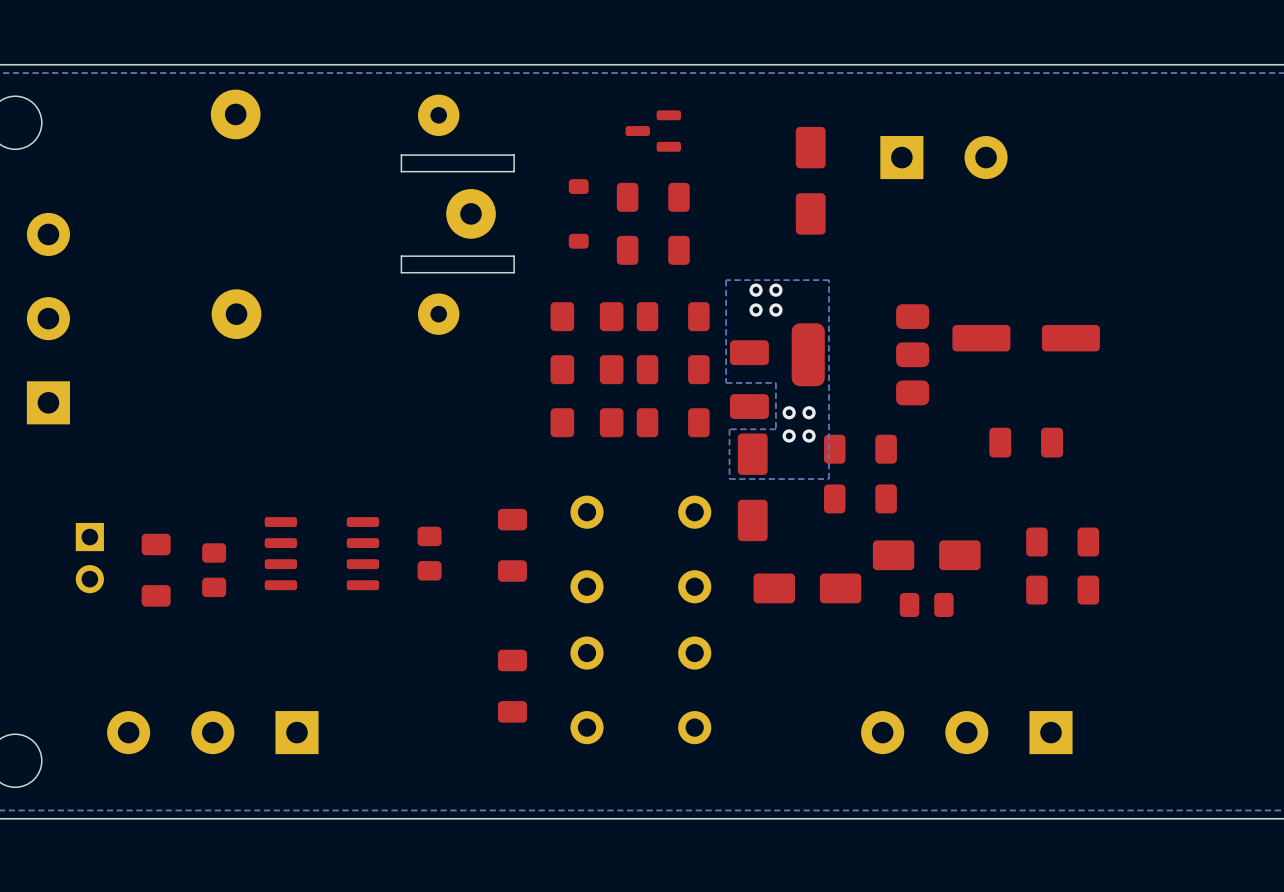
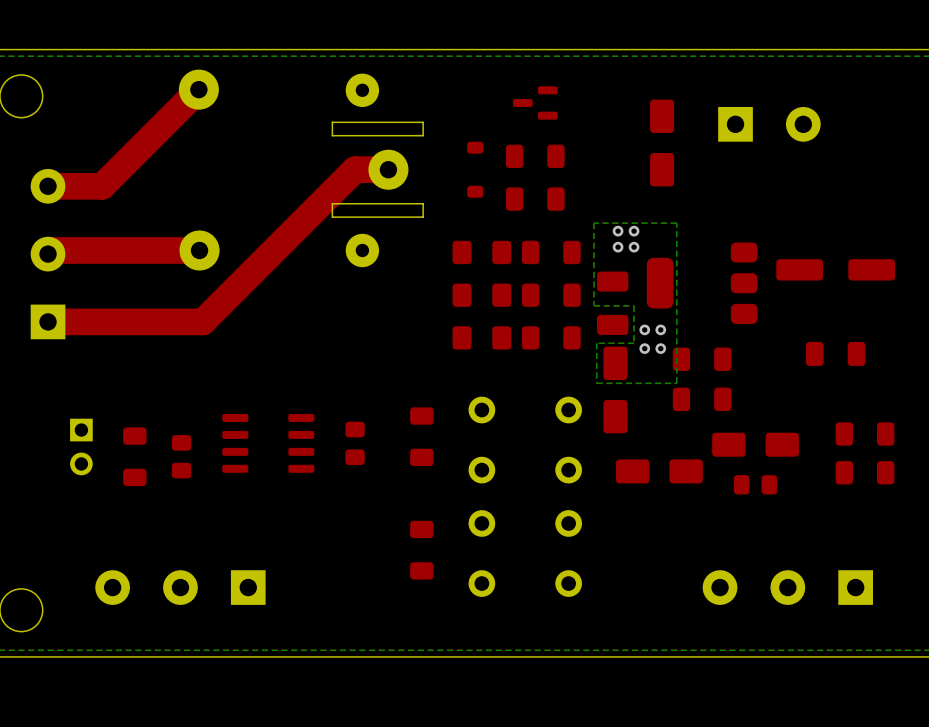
top track: none -> (198, 89) (102, 186) (48, 186)
top track: none -> (388, 169) (355, 169) (202, 321) (48, 321)
top track: none -> (199, 250) (51, 250) (48, 254)

